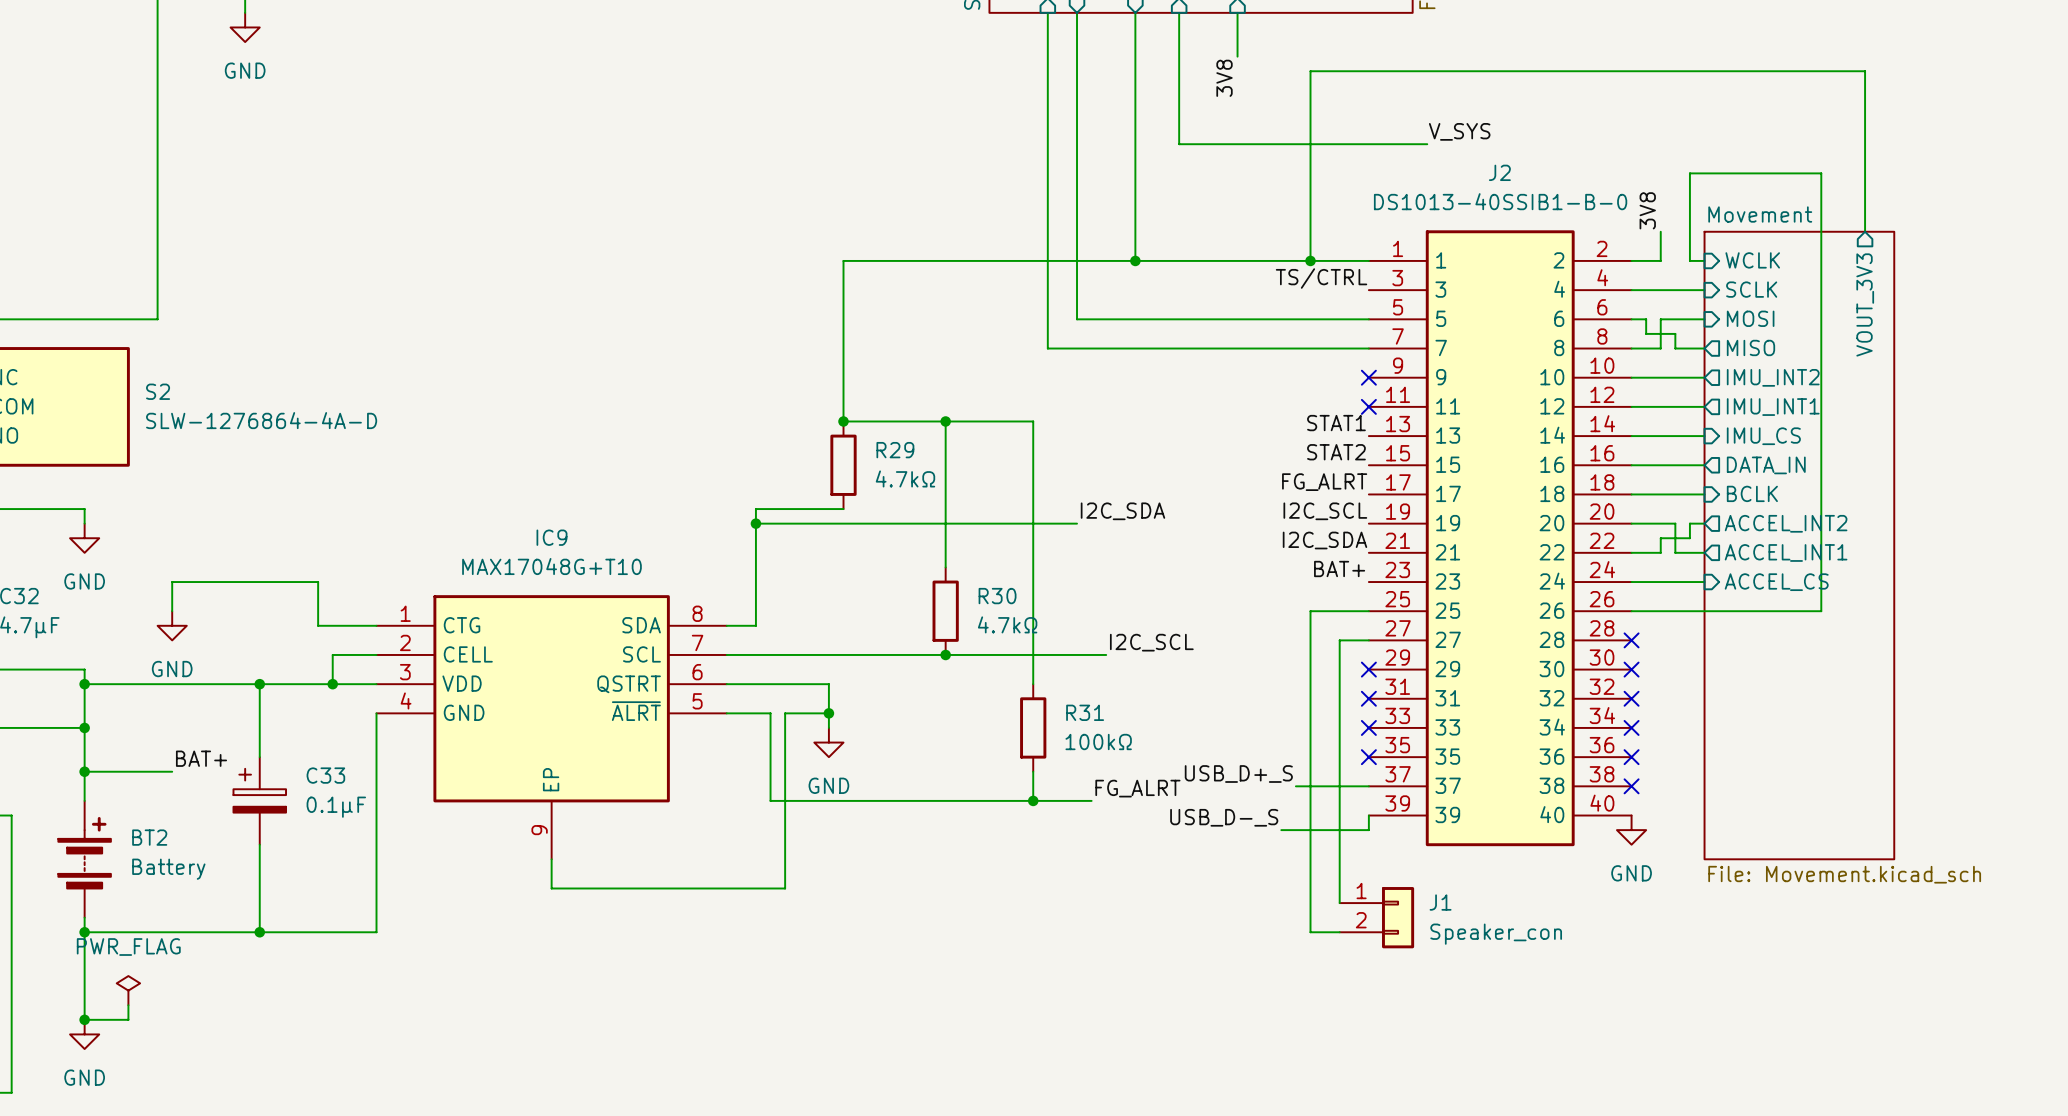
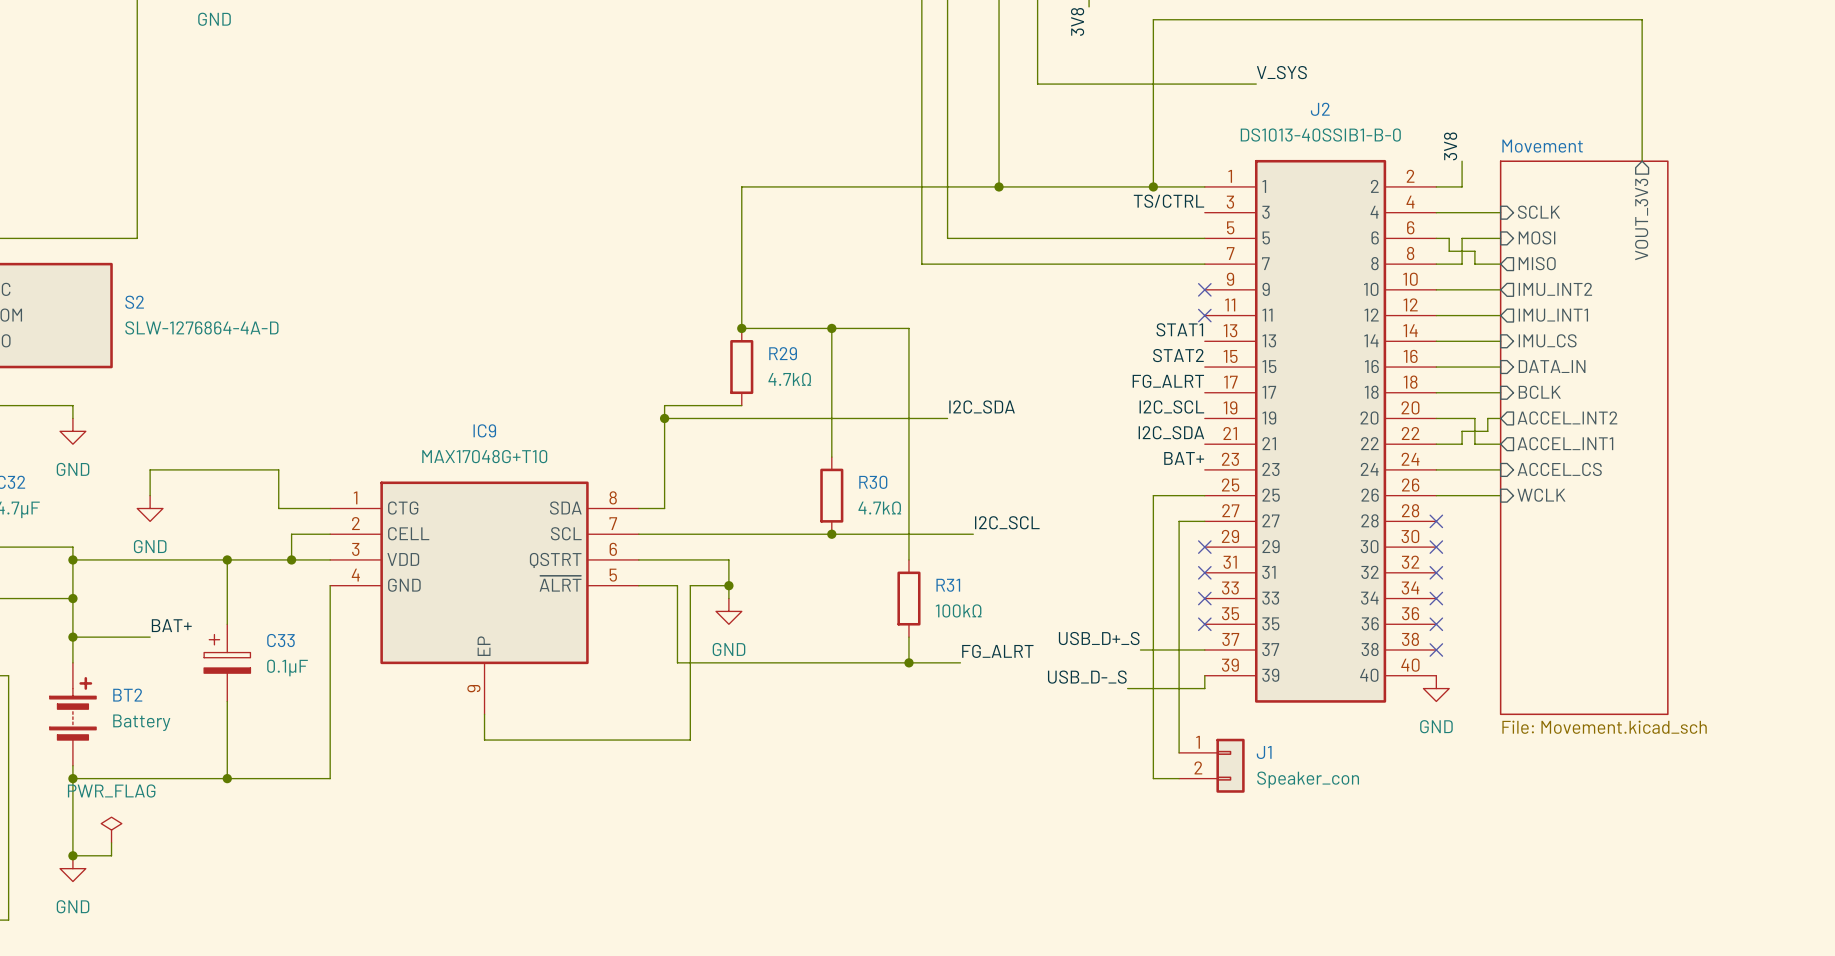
wire: (1704, 260) (1689, 260) (1689, 173) (1821, 173) (1821, 611) (1704, 611) -> none
sheet pin: WCLK (1752, 260) -> none
sheet pin shape: output (1766, 465) -> input (1552, 366)
sheet pin: none -> WCLK (1541, 495)

